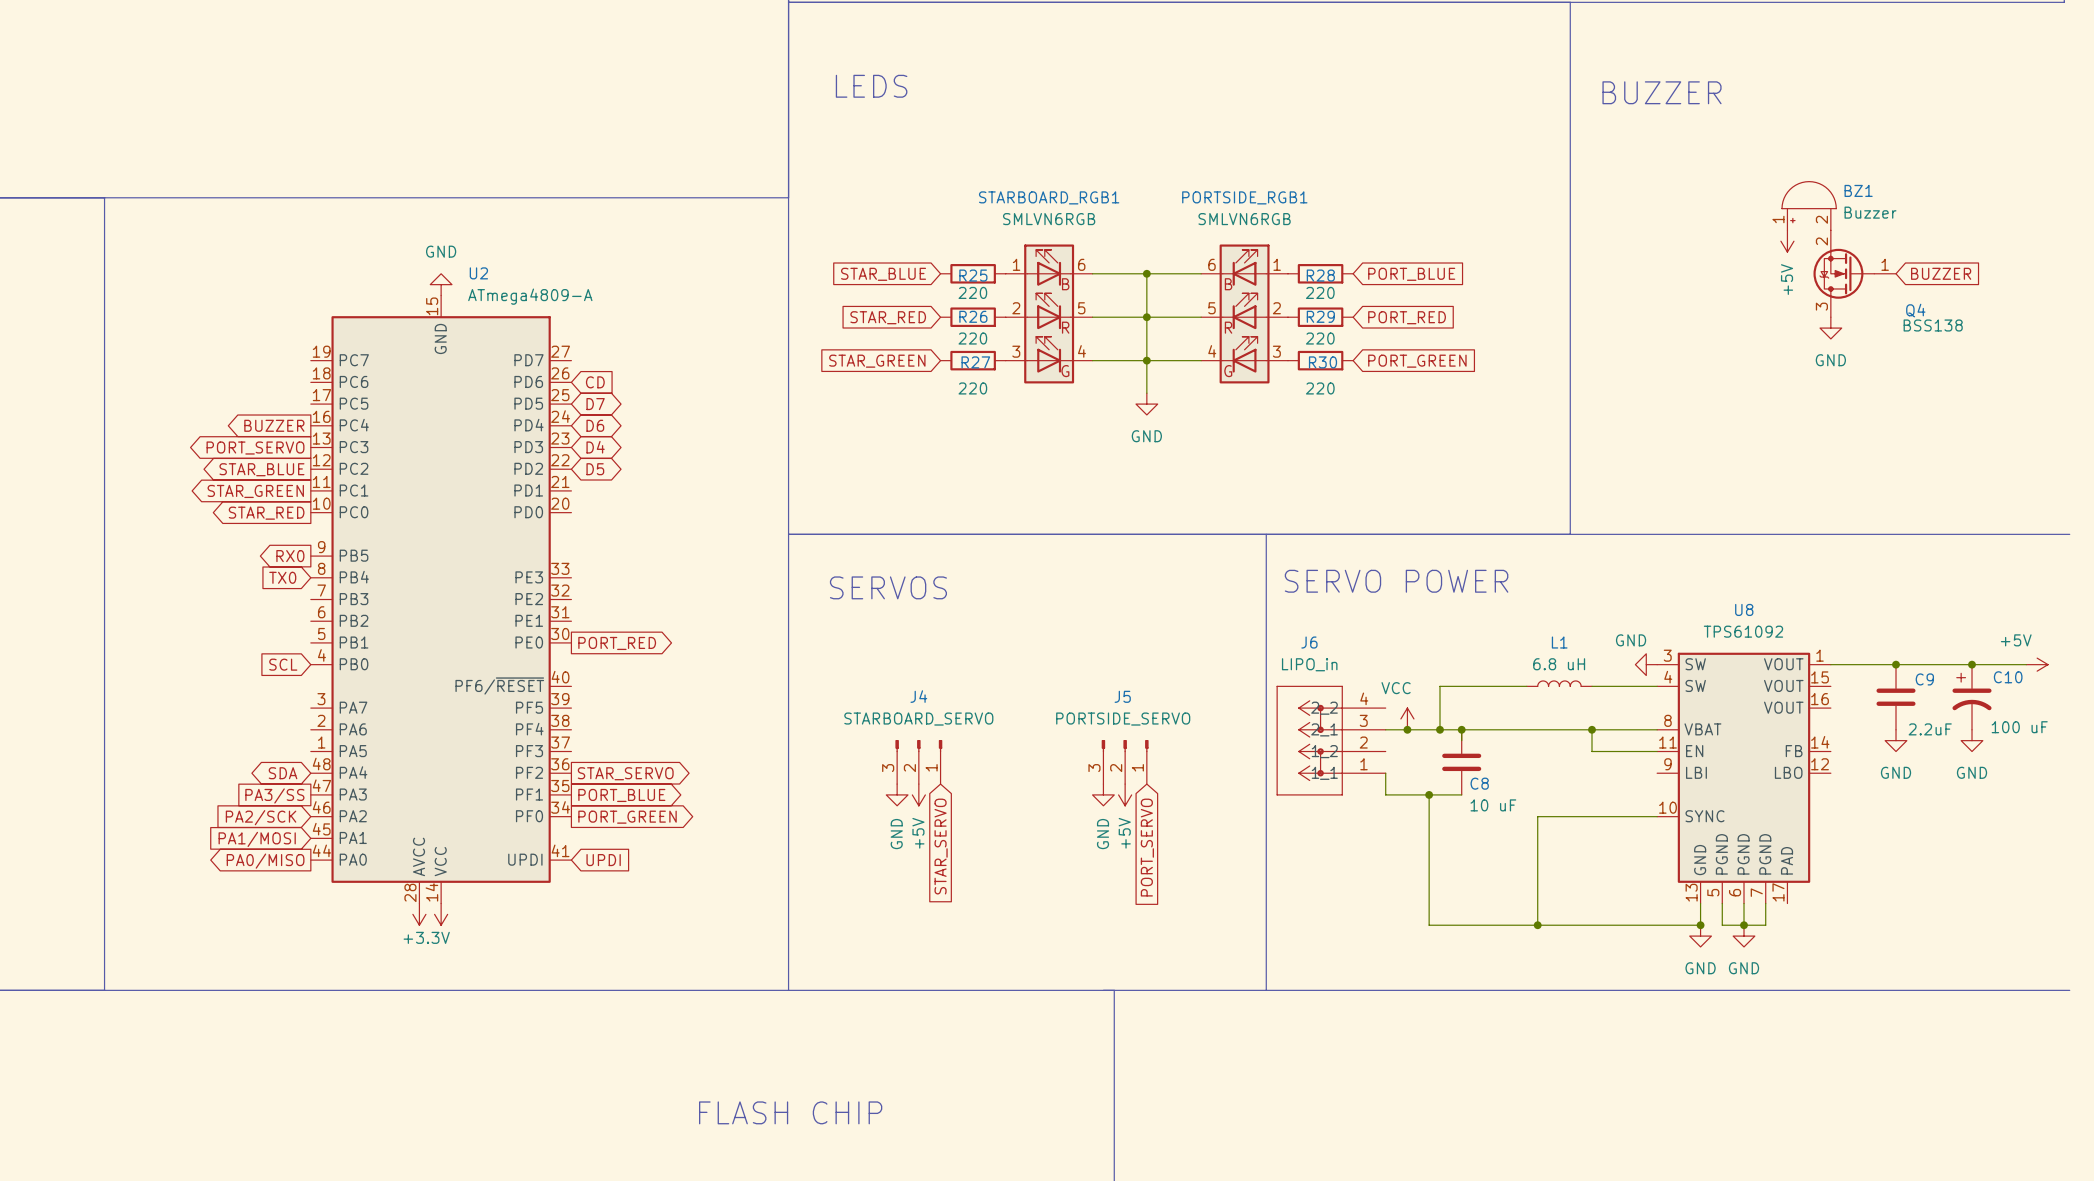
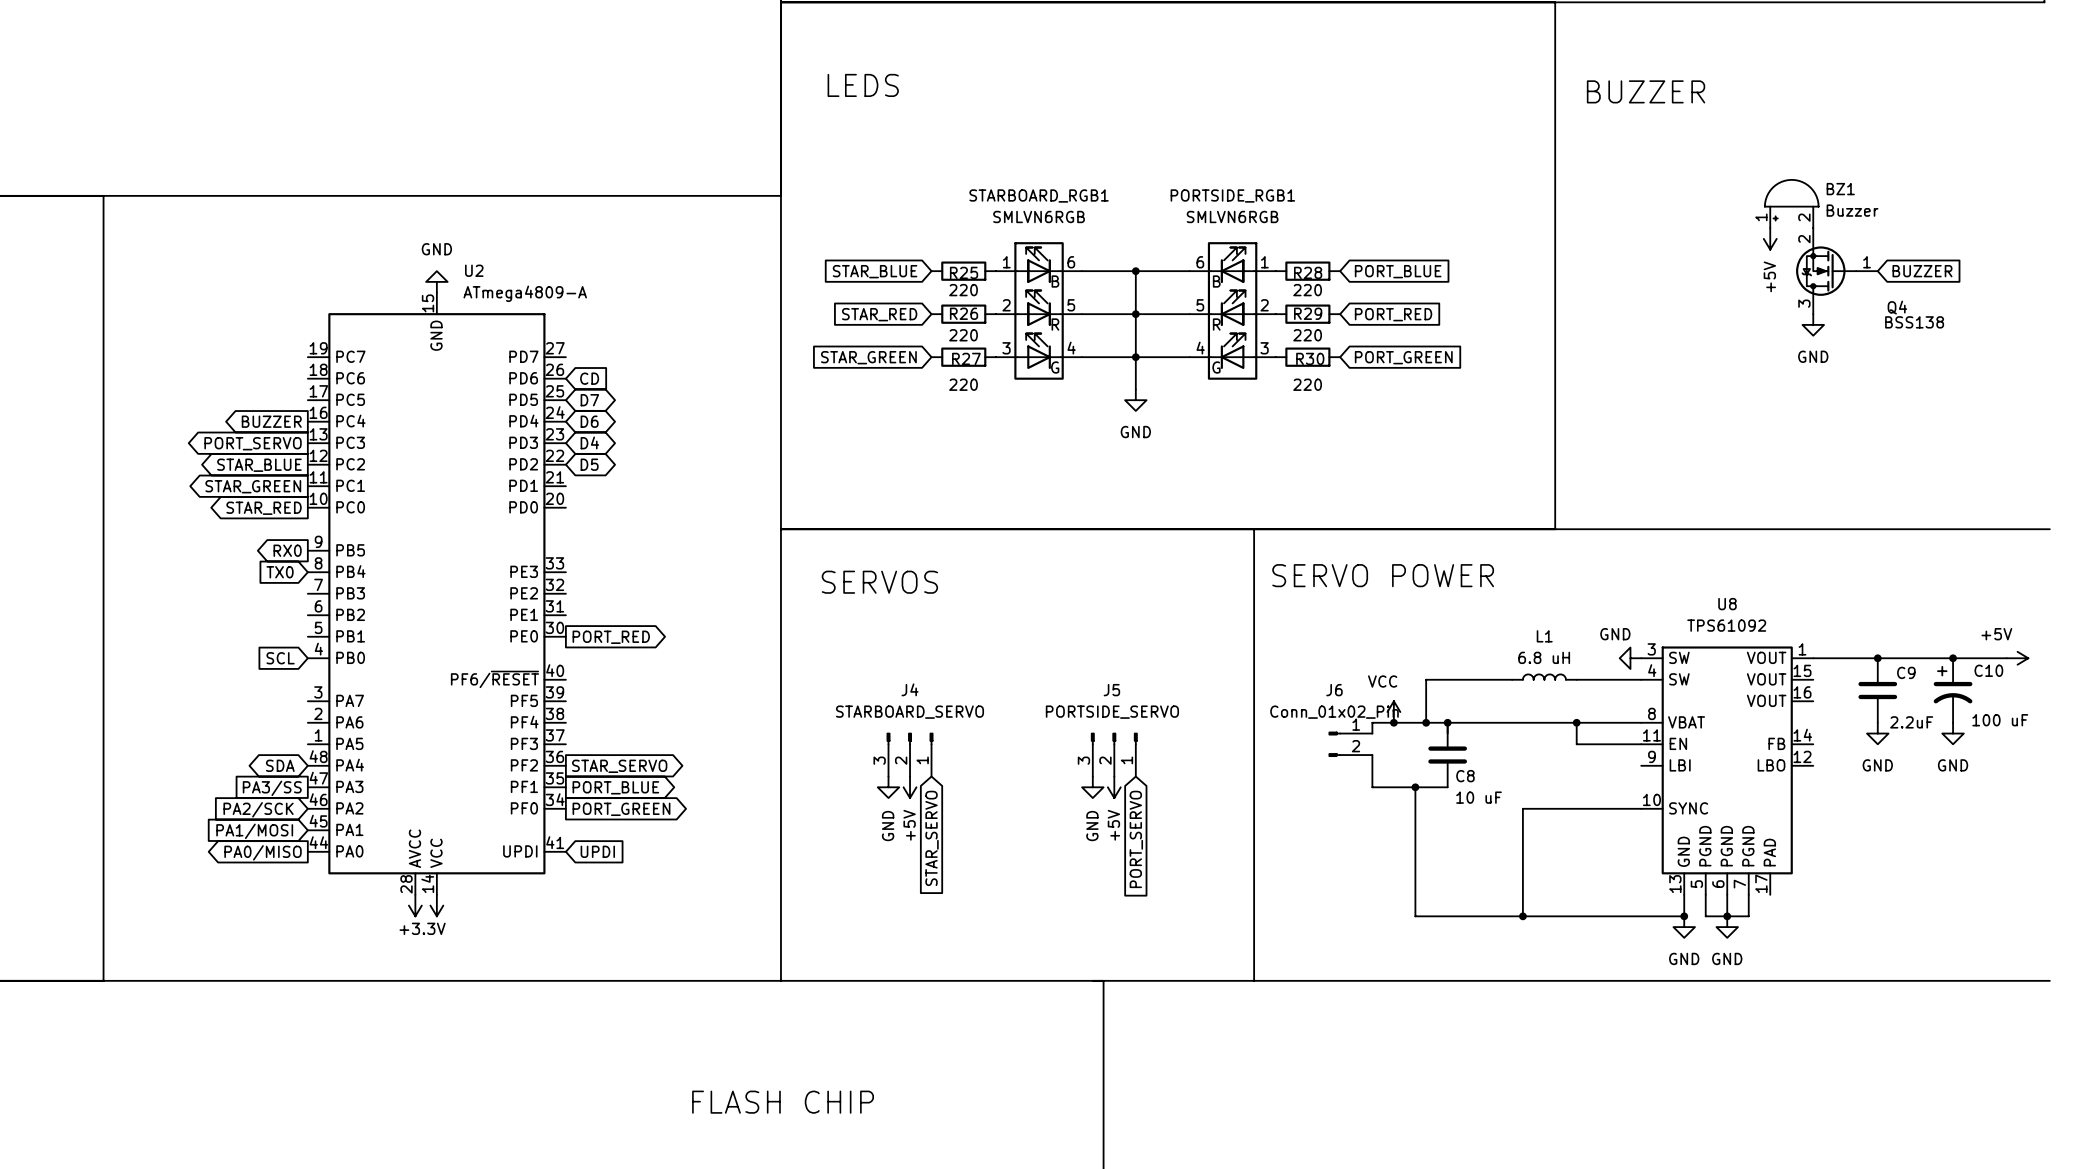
J6 name position: J6 (1309, 642) -> J6 (1334, 690)
J6 value: LIPO_in (1309, 664) -> Conn_01x02_Pin (1334, 712)
J6 symbol: [1276, 685, 1386, 796] -> [1328, 731, 1373, 757]
wire: none -> (1372, 722) (1372, 733)
wire: none -> (1372, 755) (1372, 765)

